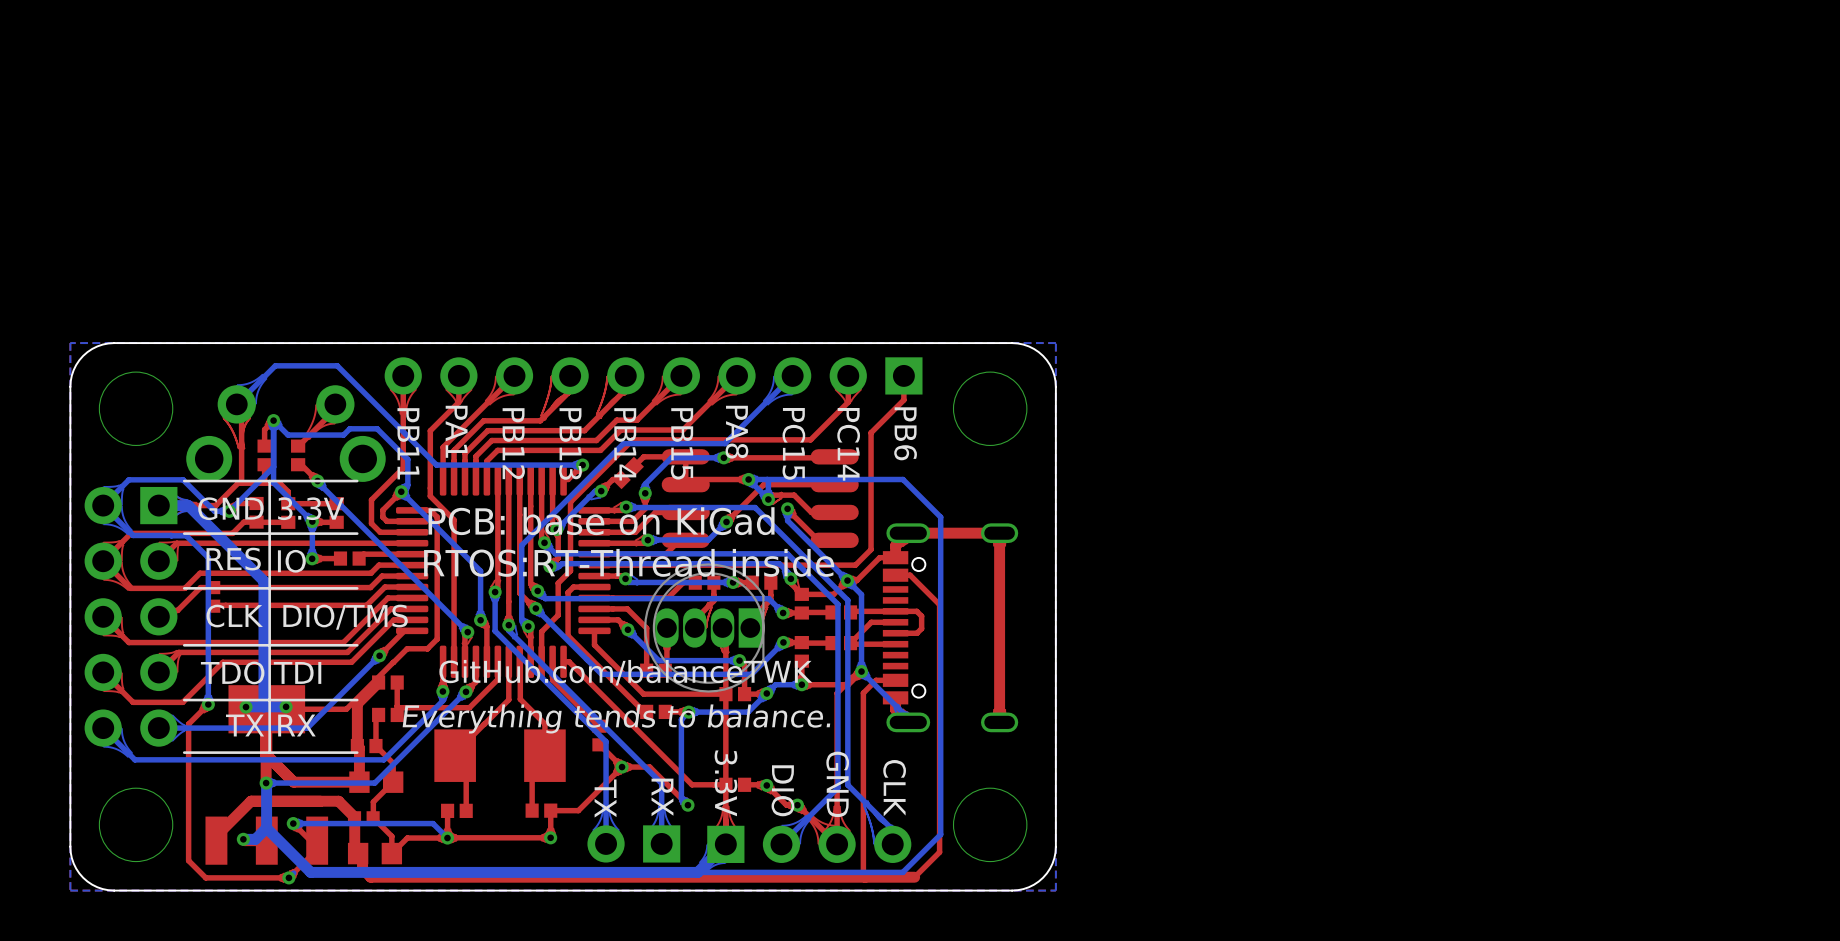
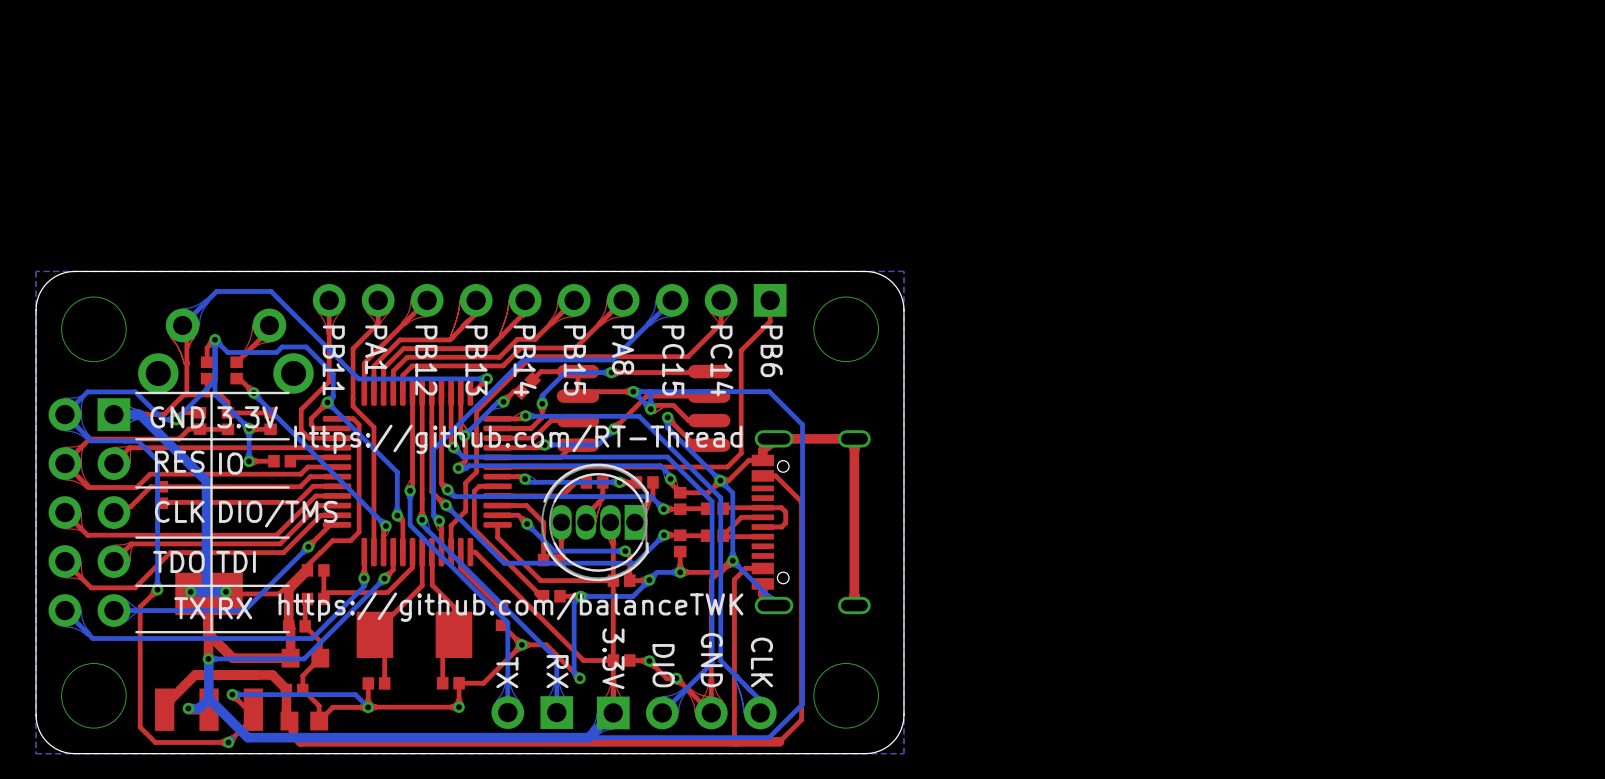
text: PCB: base on KiCad (601, 521) -> none
text: none -> https://github.com/RT-Thread (518, 439)
text: RTOS:RT-Thread inside (629, 562) -> none
part footprint: [644, 563, 765, 693] -> [541, 463, 649, 582]
text: GitHub.com/balanceTWK (625, 672) -> none
text: Everything tends to balance. (616, 718) -> https://github.com/balanceTWK (510, 607)

